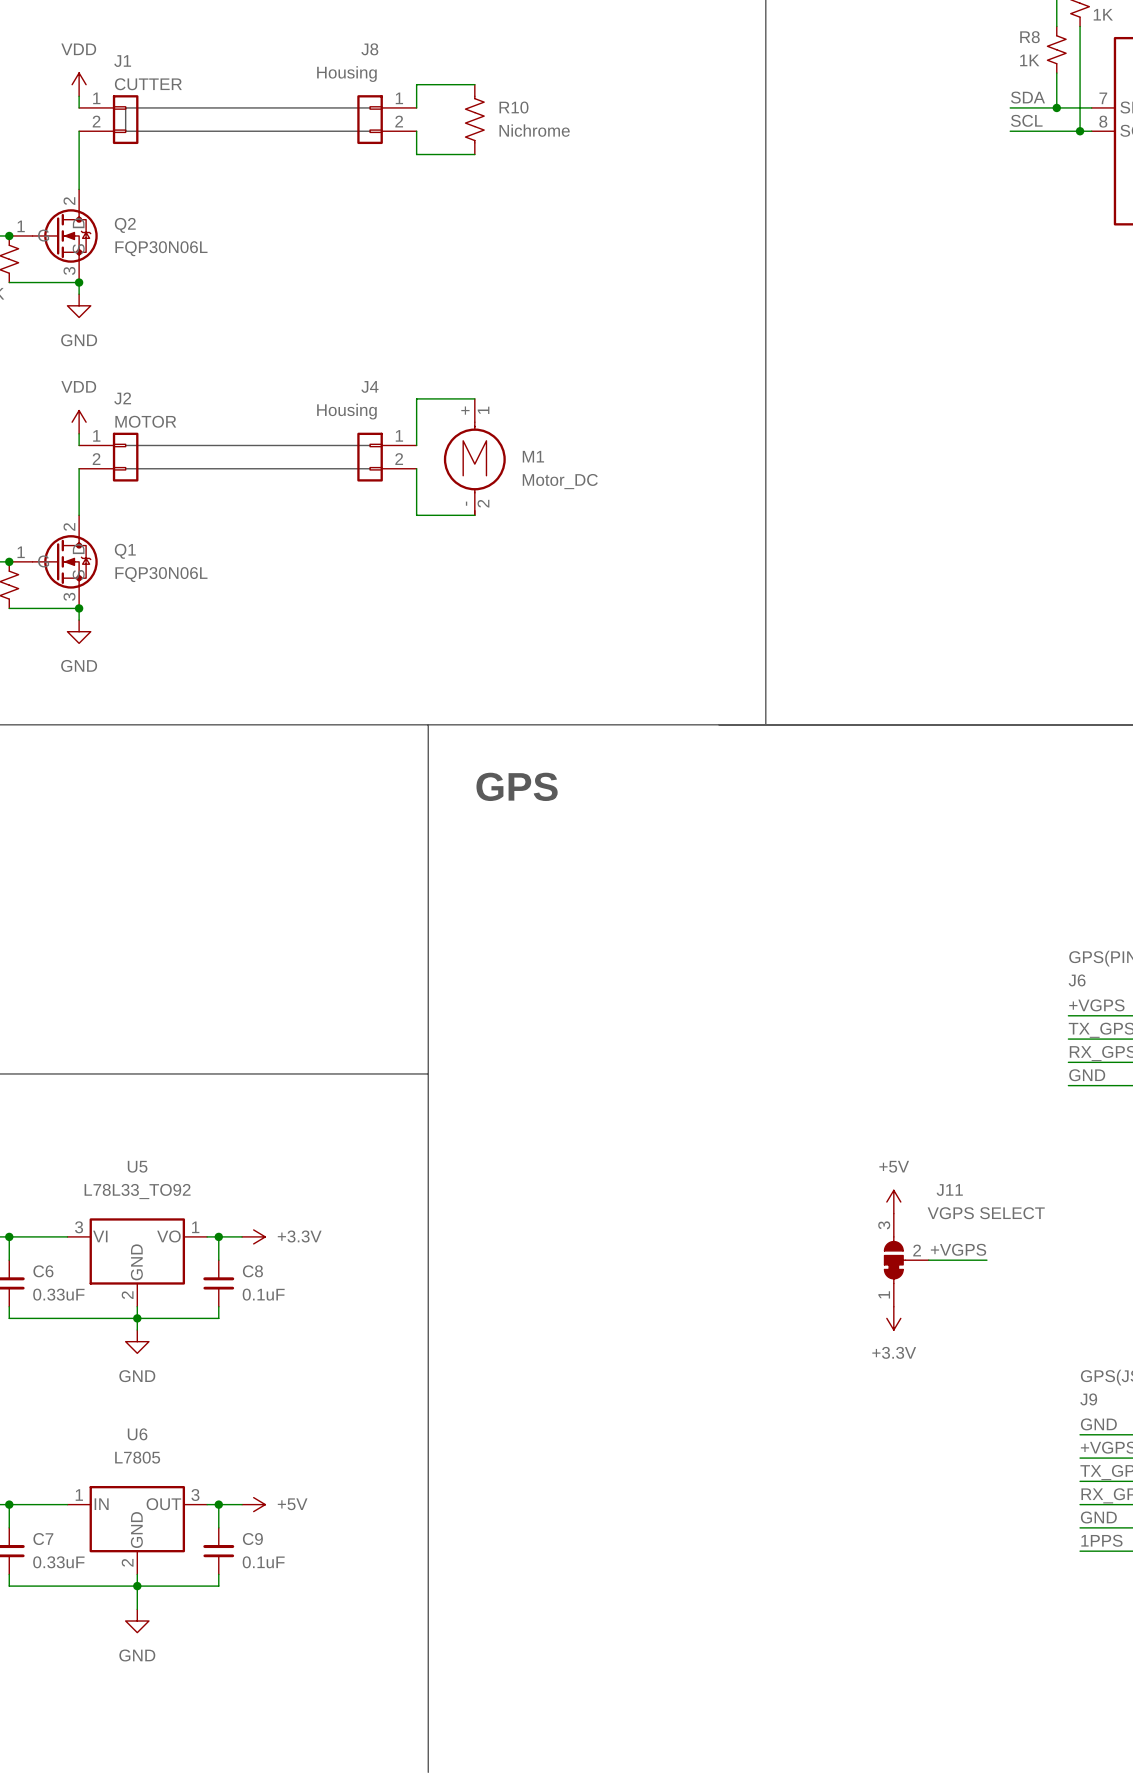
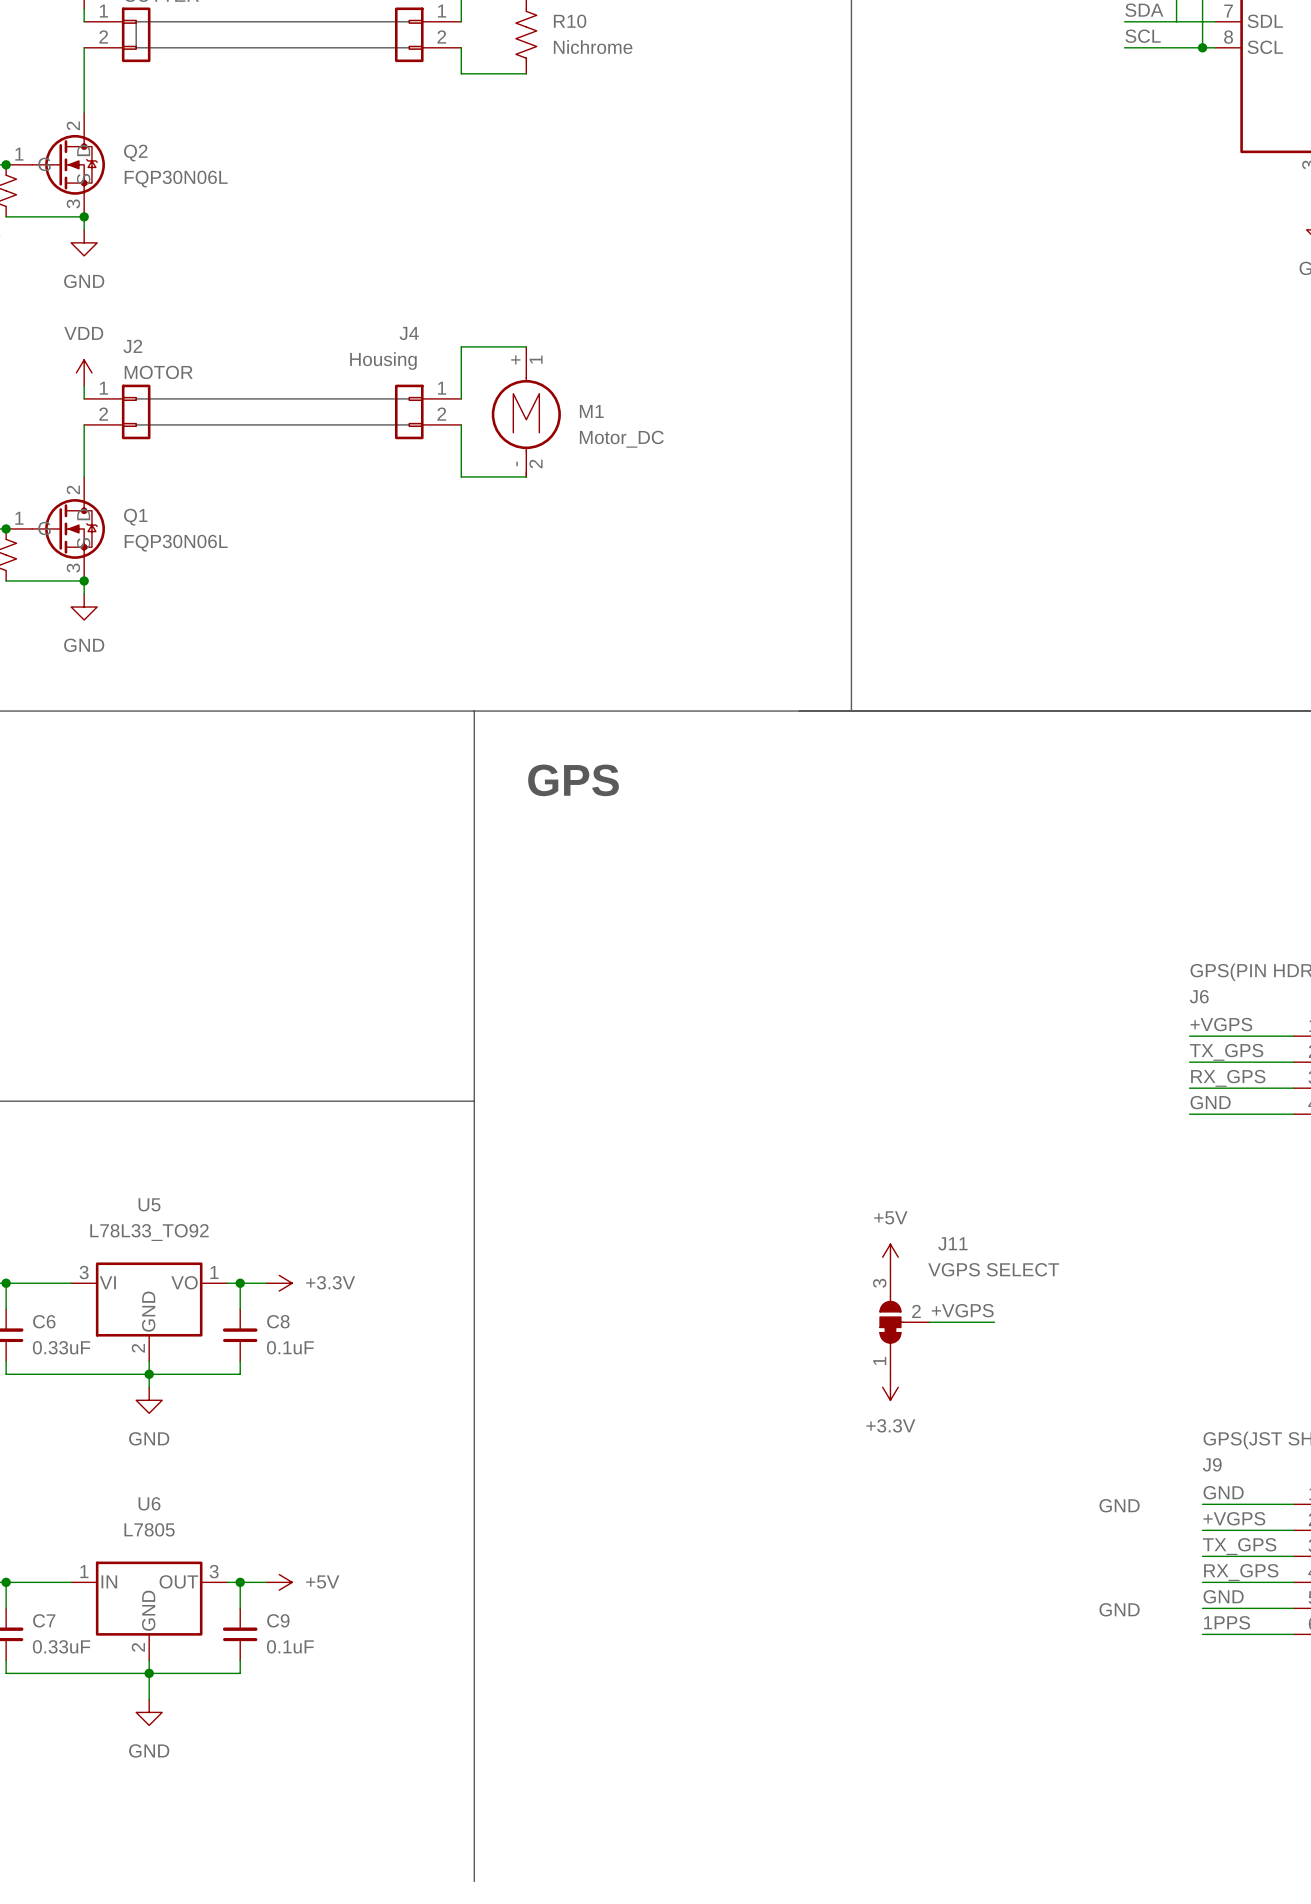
junction: (1056, 107) -> none
power symbol position: +5V (893, 1202) -> +5V (890, 1257)
label position: +VGPS (958, 1249) -> +VGPS (962, 1310)
J11 position: (906, 1260) -> (904, 1322)
wire: (928, 1260) (986, 1260) -> (929, 1322) (994, 1322)
power symbol position: +3.3V (893, 1318) -> +3.3V (890, 1387)
label: none -> GND (1119, 1505)
label: none -> GND (1119, 1609)

